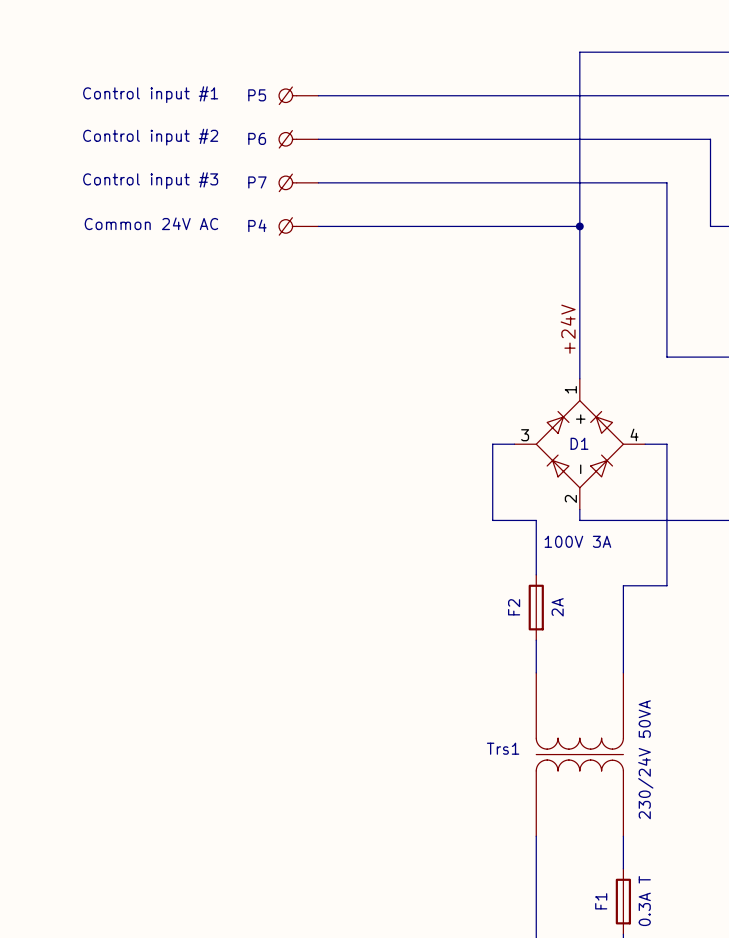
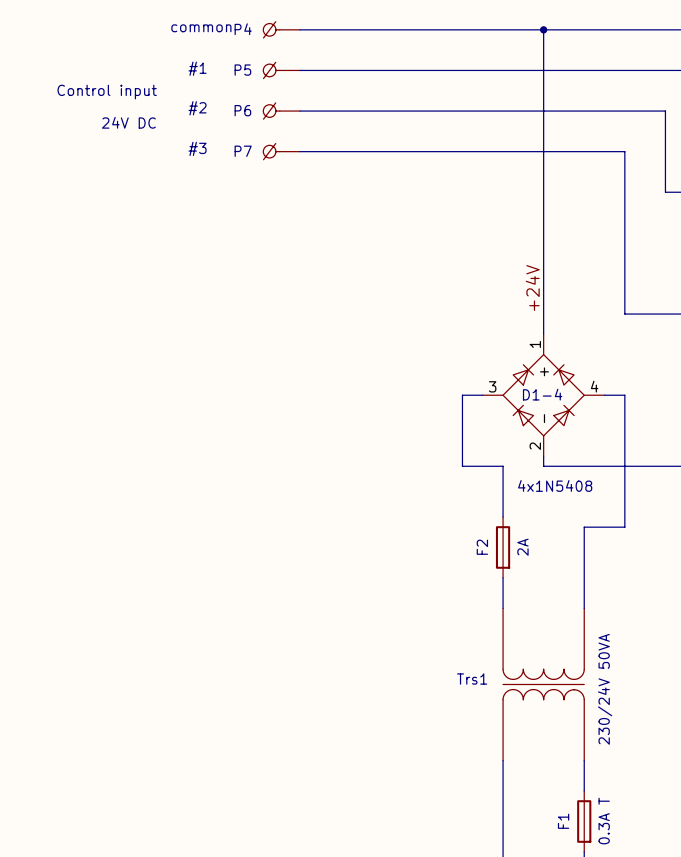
text: none -> common (201, 28)
junction: none -> (543, 29)
text: Control input #1 (150, 94) -> #1 (197, 68)
text: none -> Control input (107, 92)
text: Control input #2 (150, 137) -> #2 (197, 108)
text: none -> 24V DC (128, 122)
text: Control input #3 (150, 180) -> #3 (197, 148)
text: Common 24V AC (151, 223) -> none
P4 position: (298, 226) -> (281, 29)
wire: (318, 226) (579, 226) -> (300, 29) (543, 29)
junction: (579, 226) -> none
D1 name: D1 (579, 443) -> D1-4 (542, 394)
D1 value: 100V 3A (577, 541) -> 4x1N5408 (555, 485)

